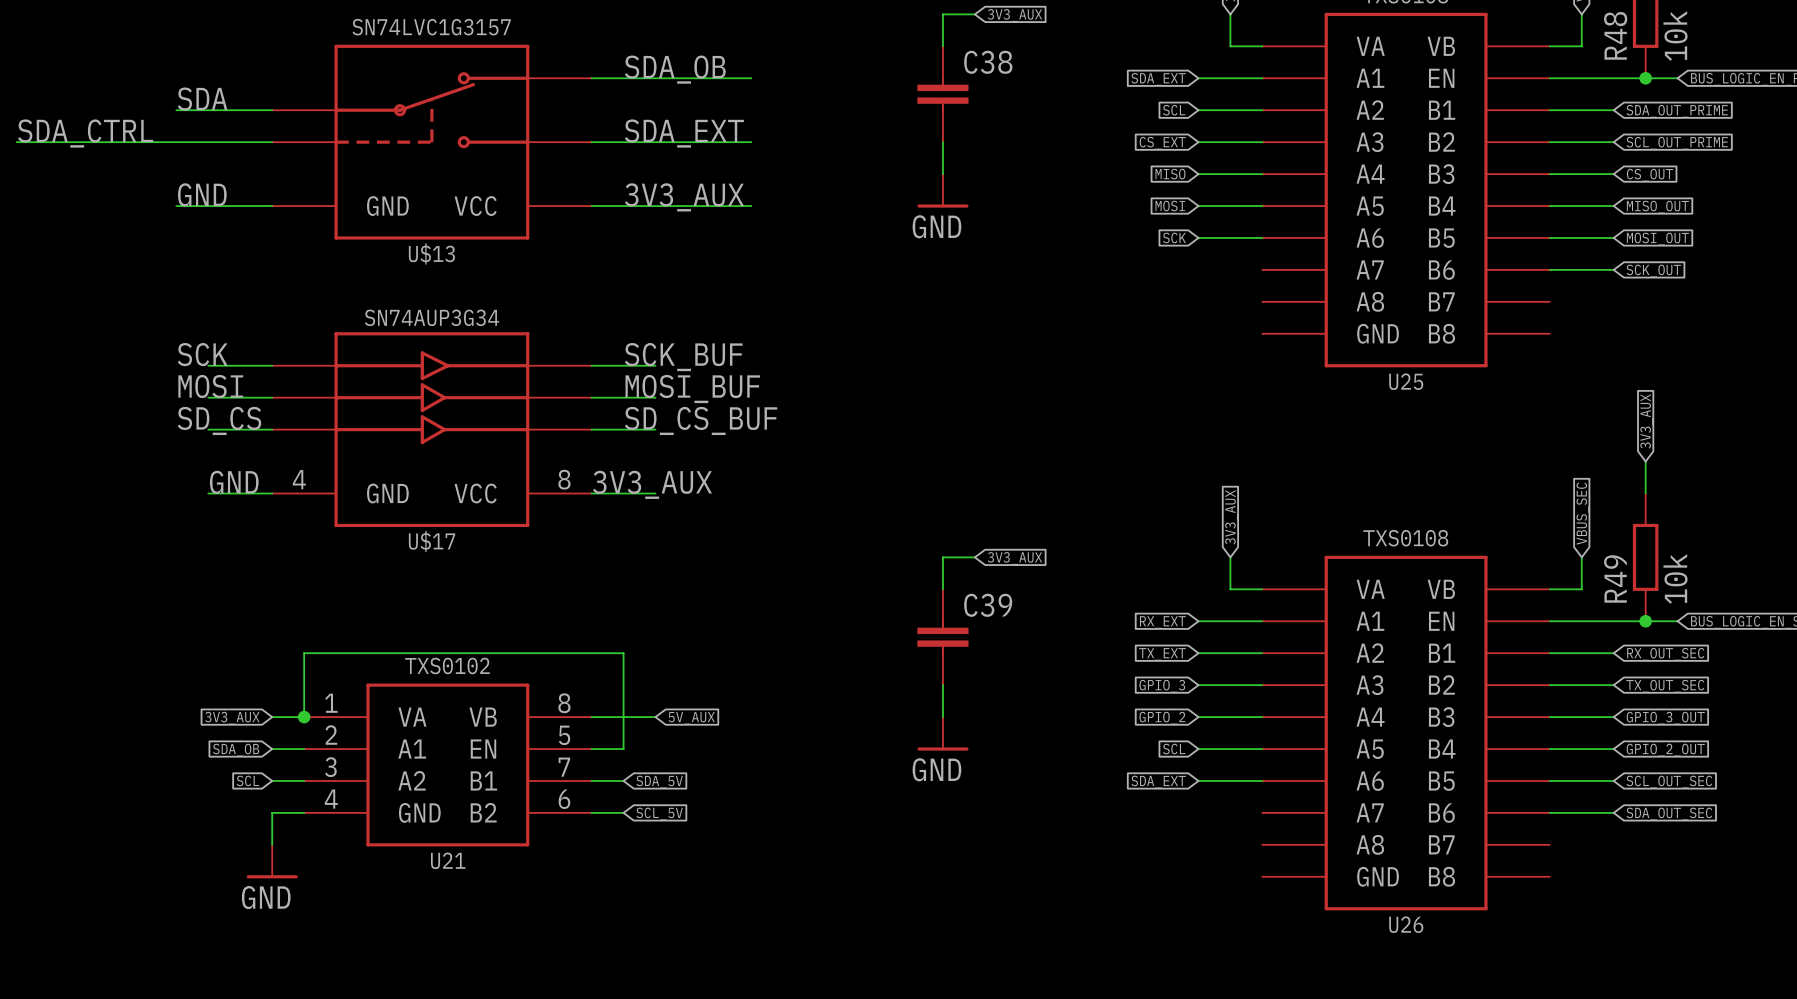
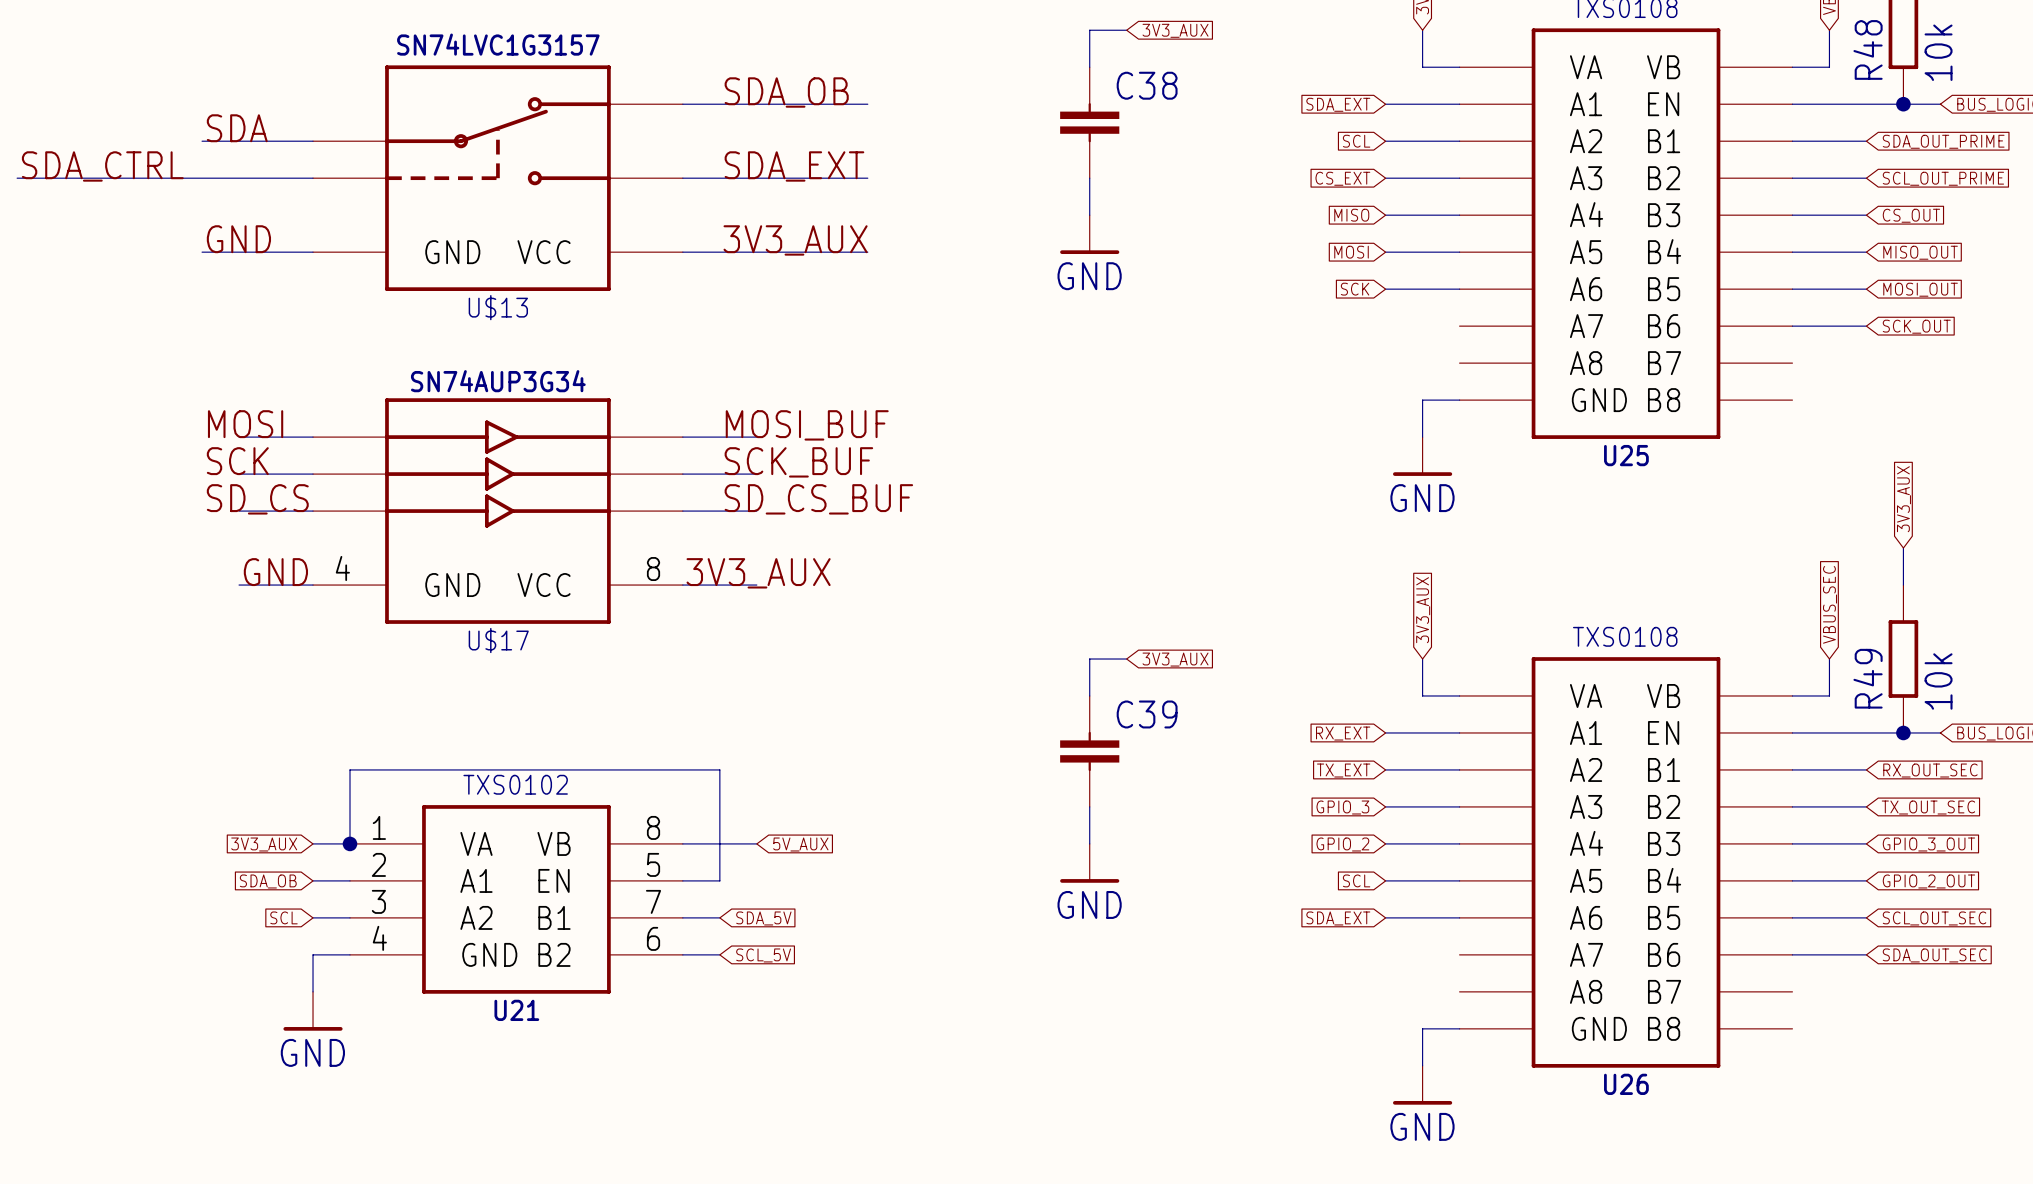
wire: none -> (1459, 400) (1422, 400) (1422, 437)
label: SCK (202, 354) -> MOSI (245, 424)
label: SCK_BUF (683, 357) -> MOSI_BUF (807, 425)
power symbol: none -> GND (1422, 456)
label: MOSI (210, 386) -> SCK (237, 461)
label: MOSI_BUF (692, 389) -> SCK_BUF (798, 462)
wire: none -> (1459, 1028) (1422, 1028) (1422, 1065)
power symbol: none -> GND (1422, 1085)

